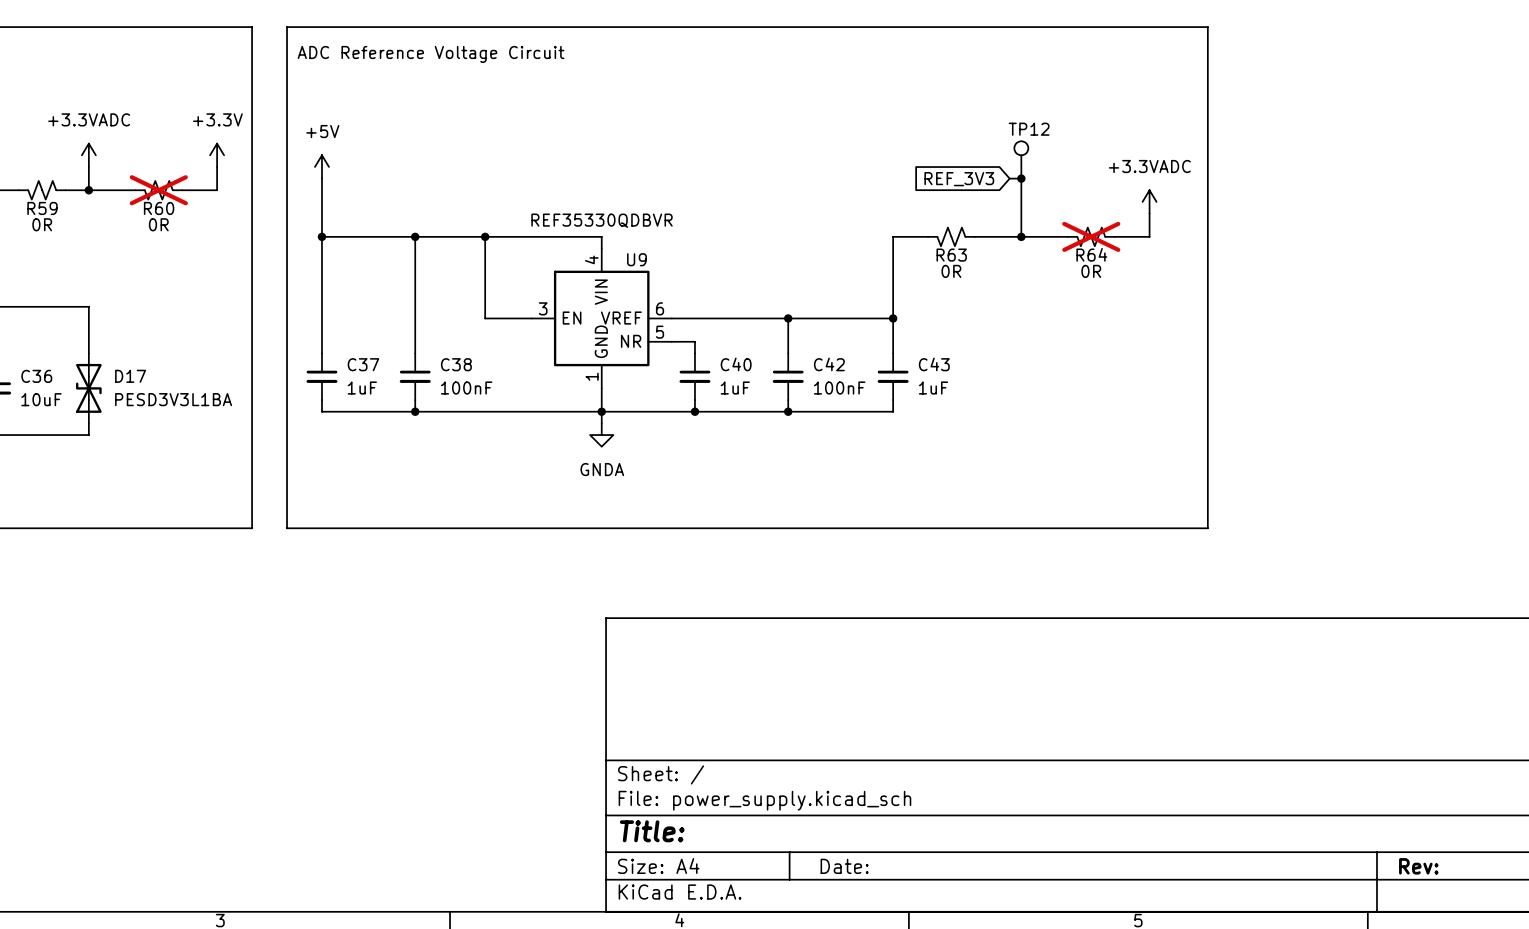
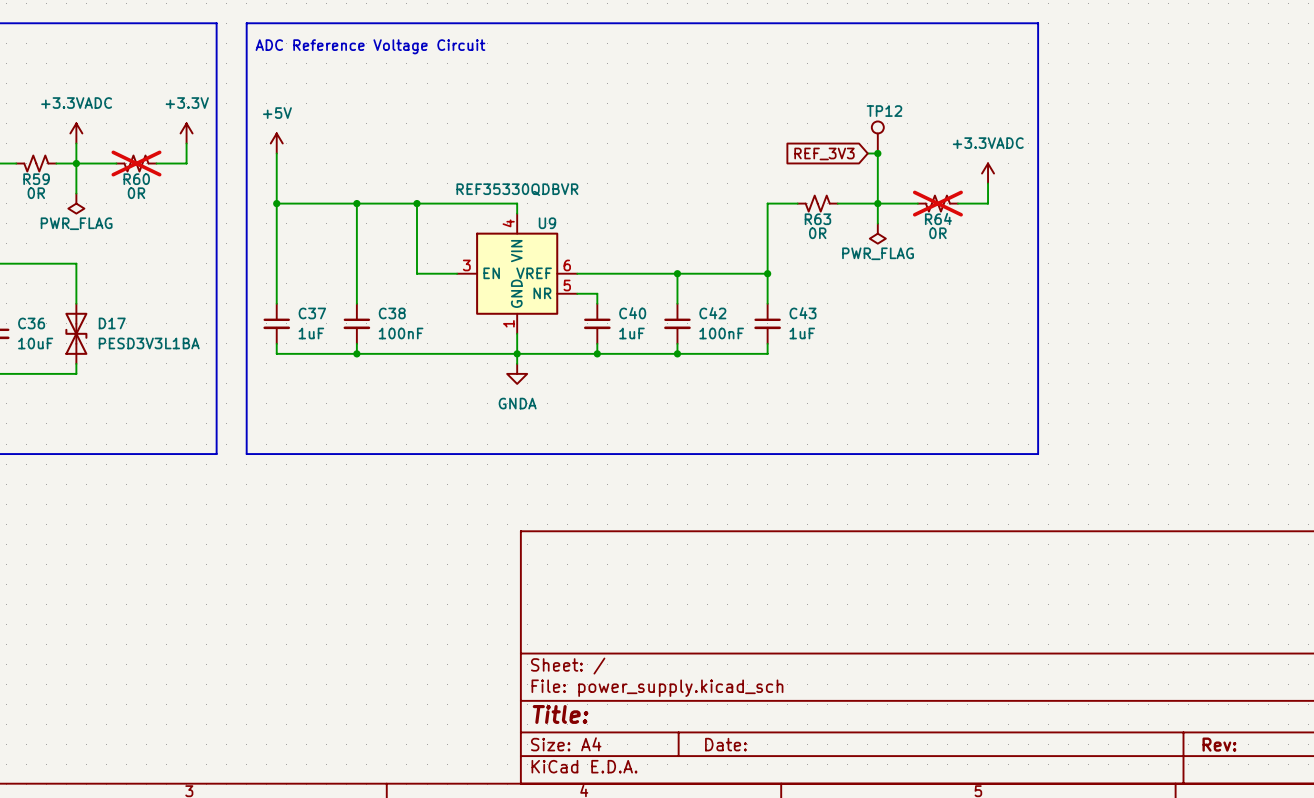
wire: none -> (76, 163) (76, 193)
power symbol: none -> PWR_FLAG (76, 203)
wire: none -> (877, 203) (877, 223)
power symbol: none -> PWR_FLAG (877, 233)

